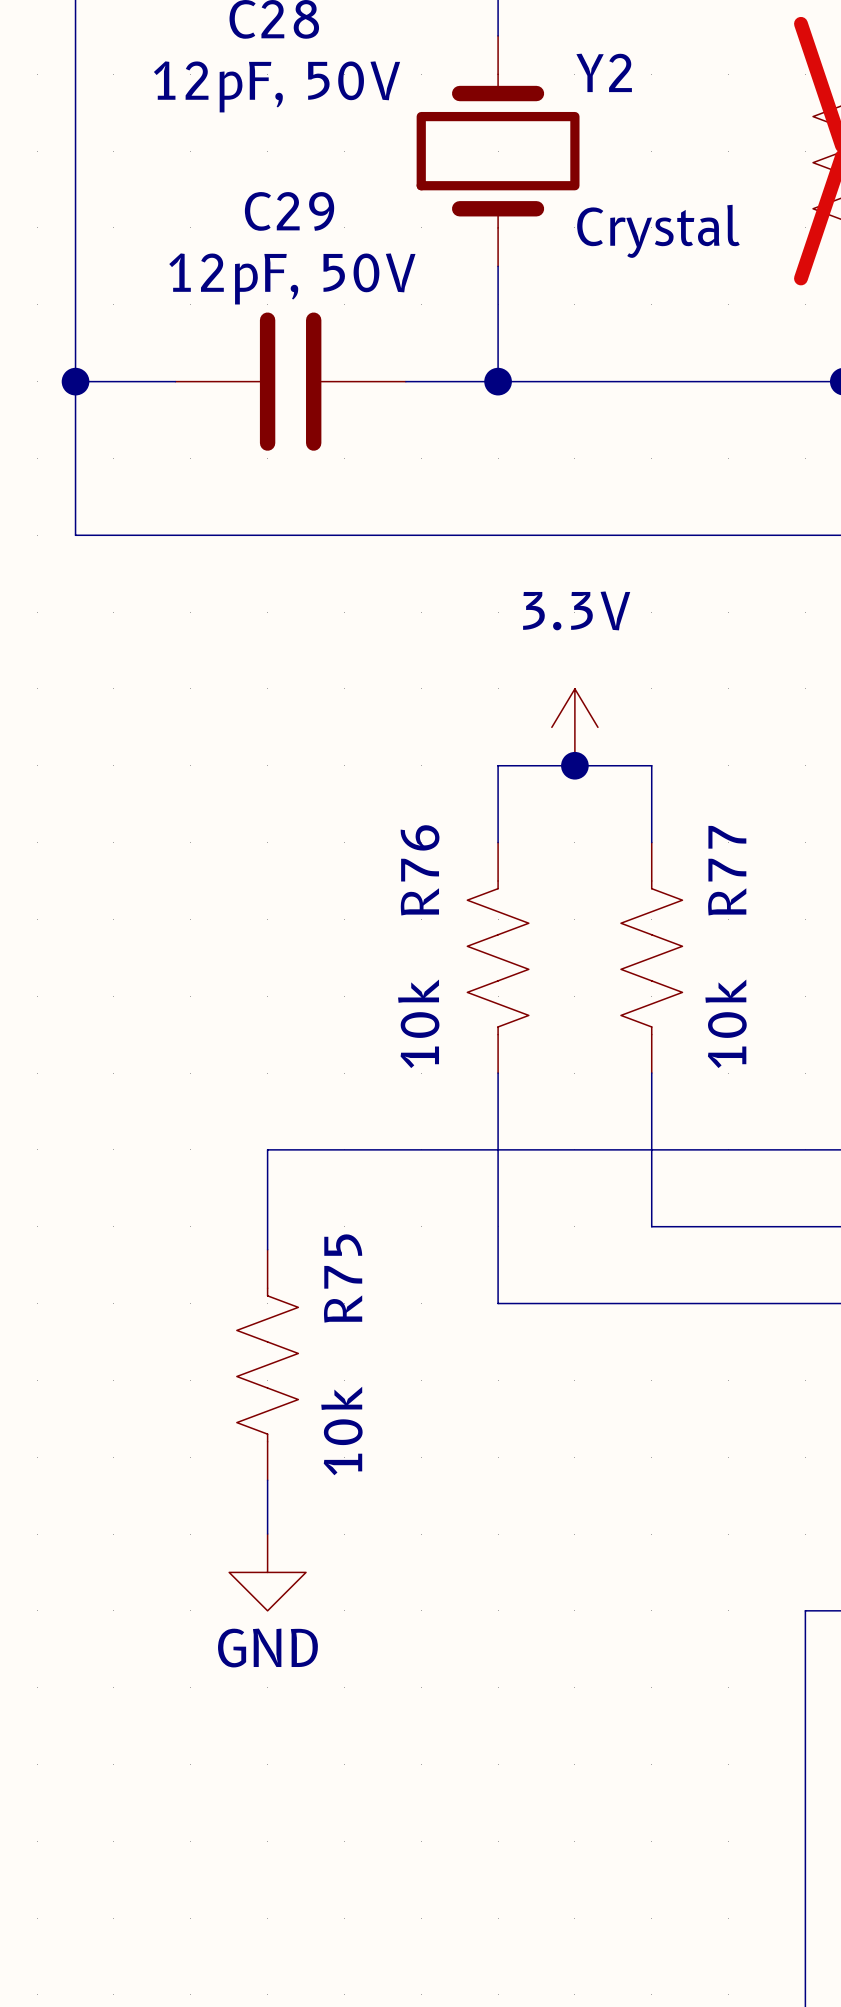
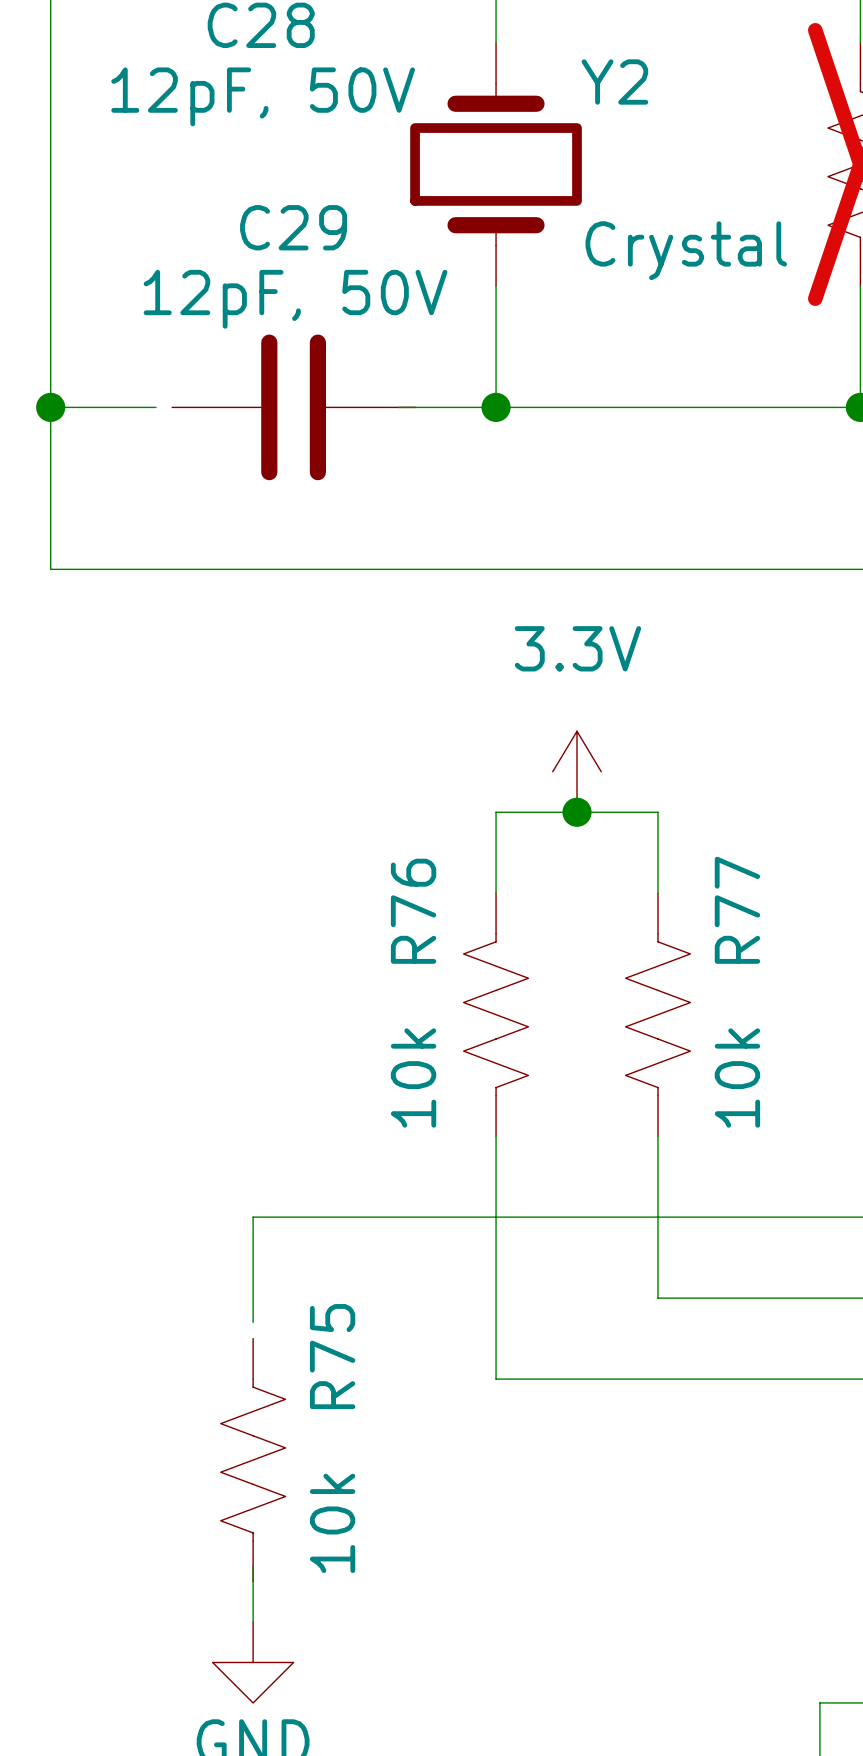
C29 position: (290, 381) -> (293, 407)
R75 position: (267, 1364) -> (253, 1460)

